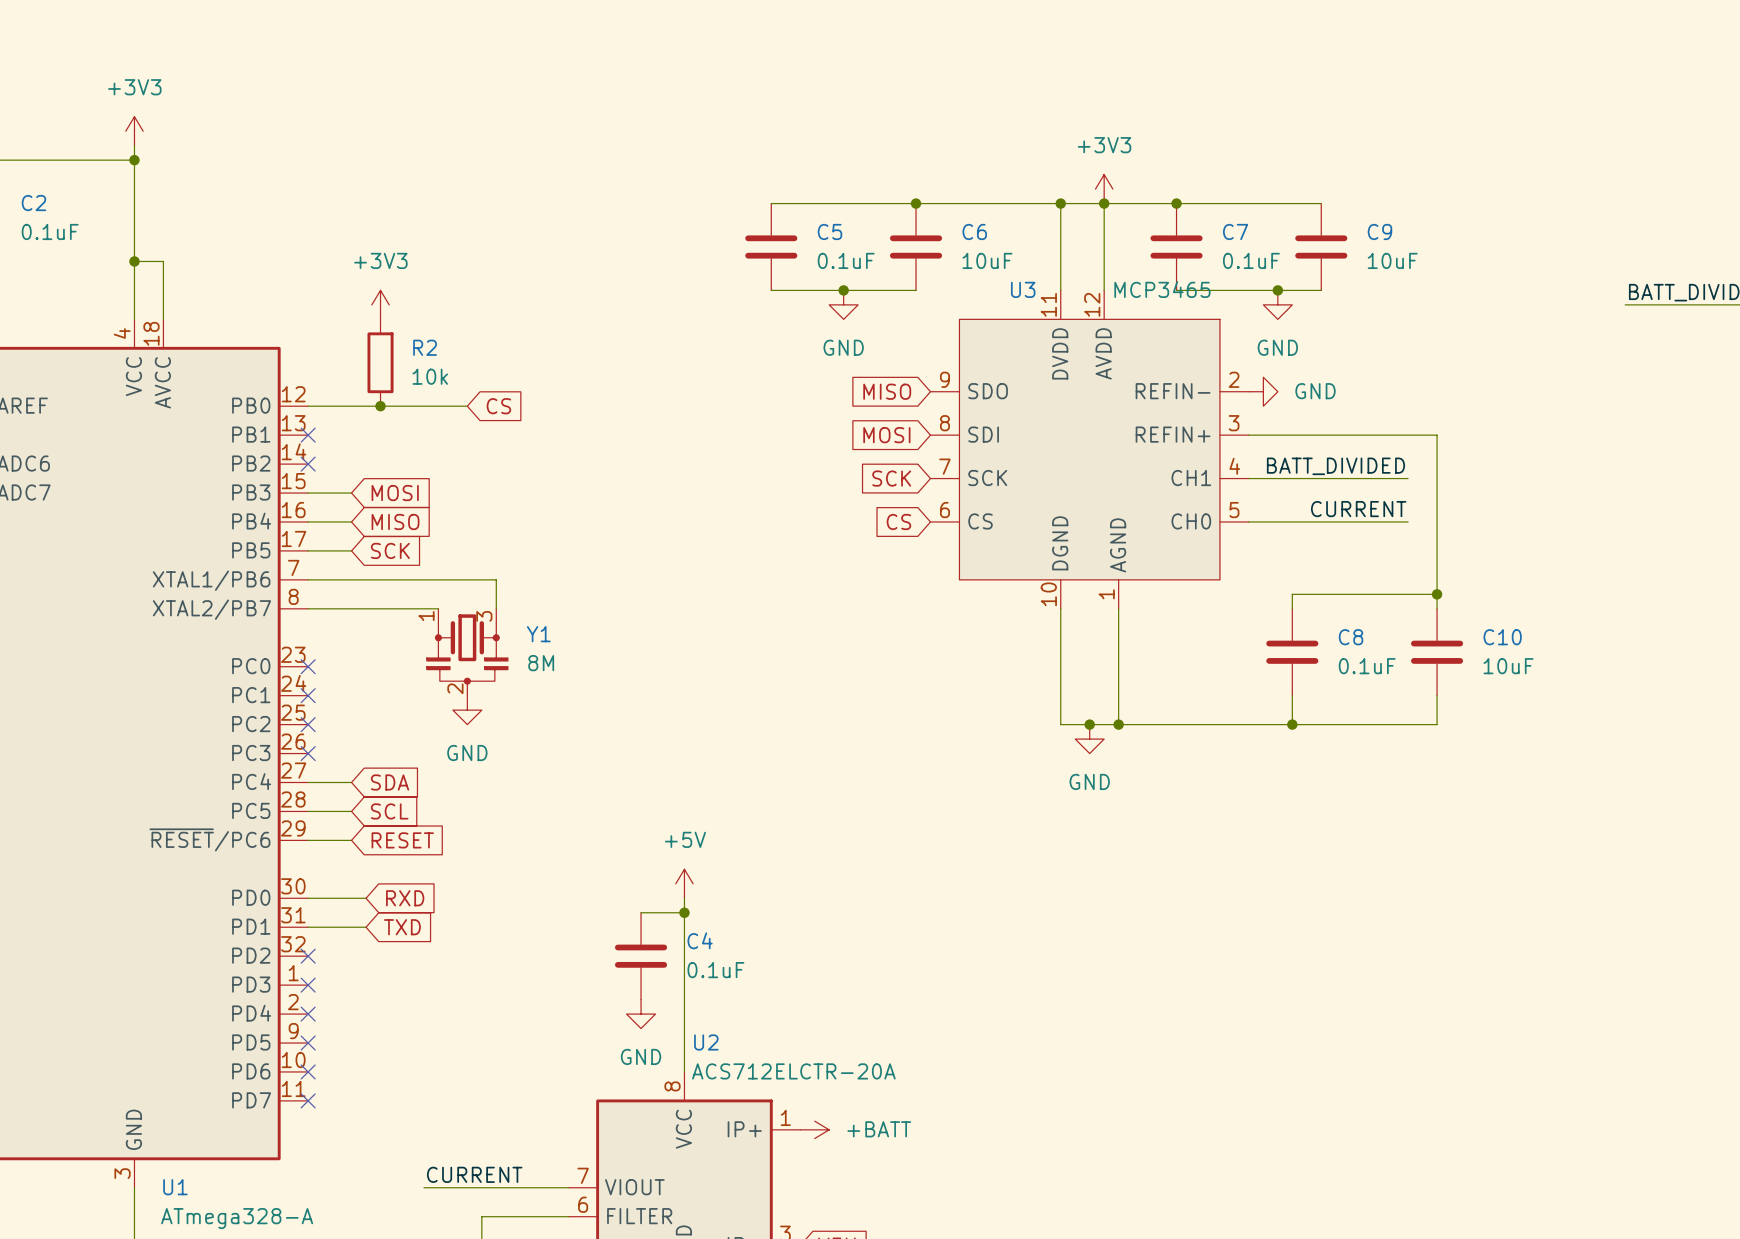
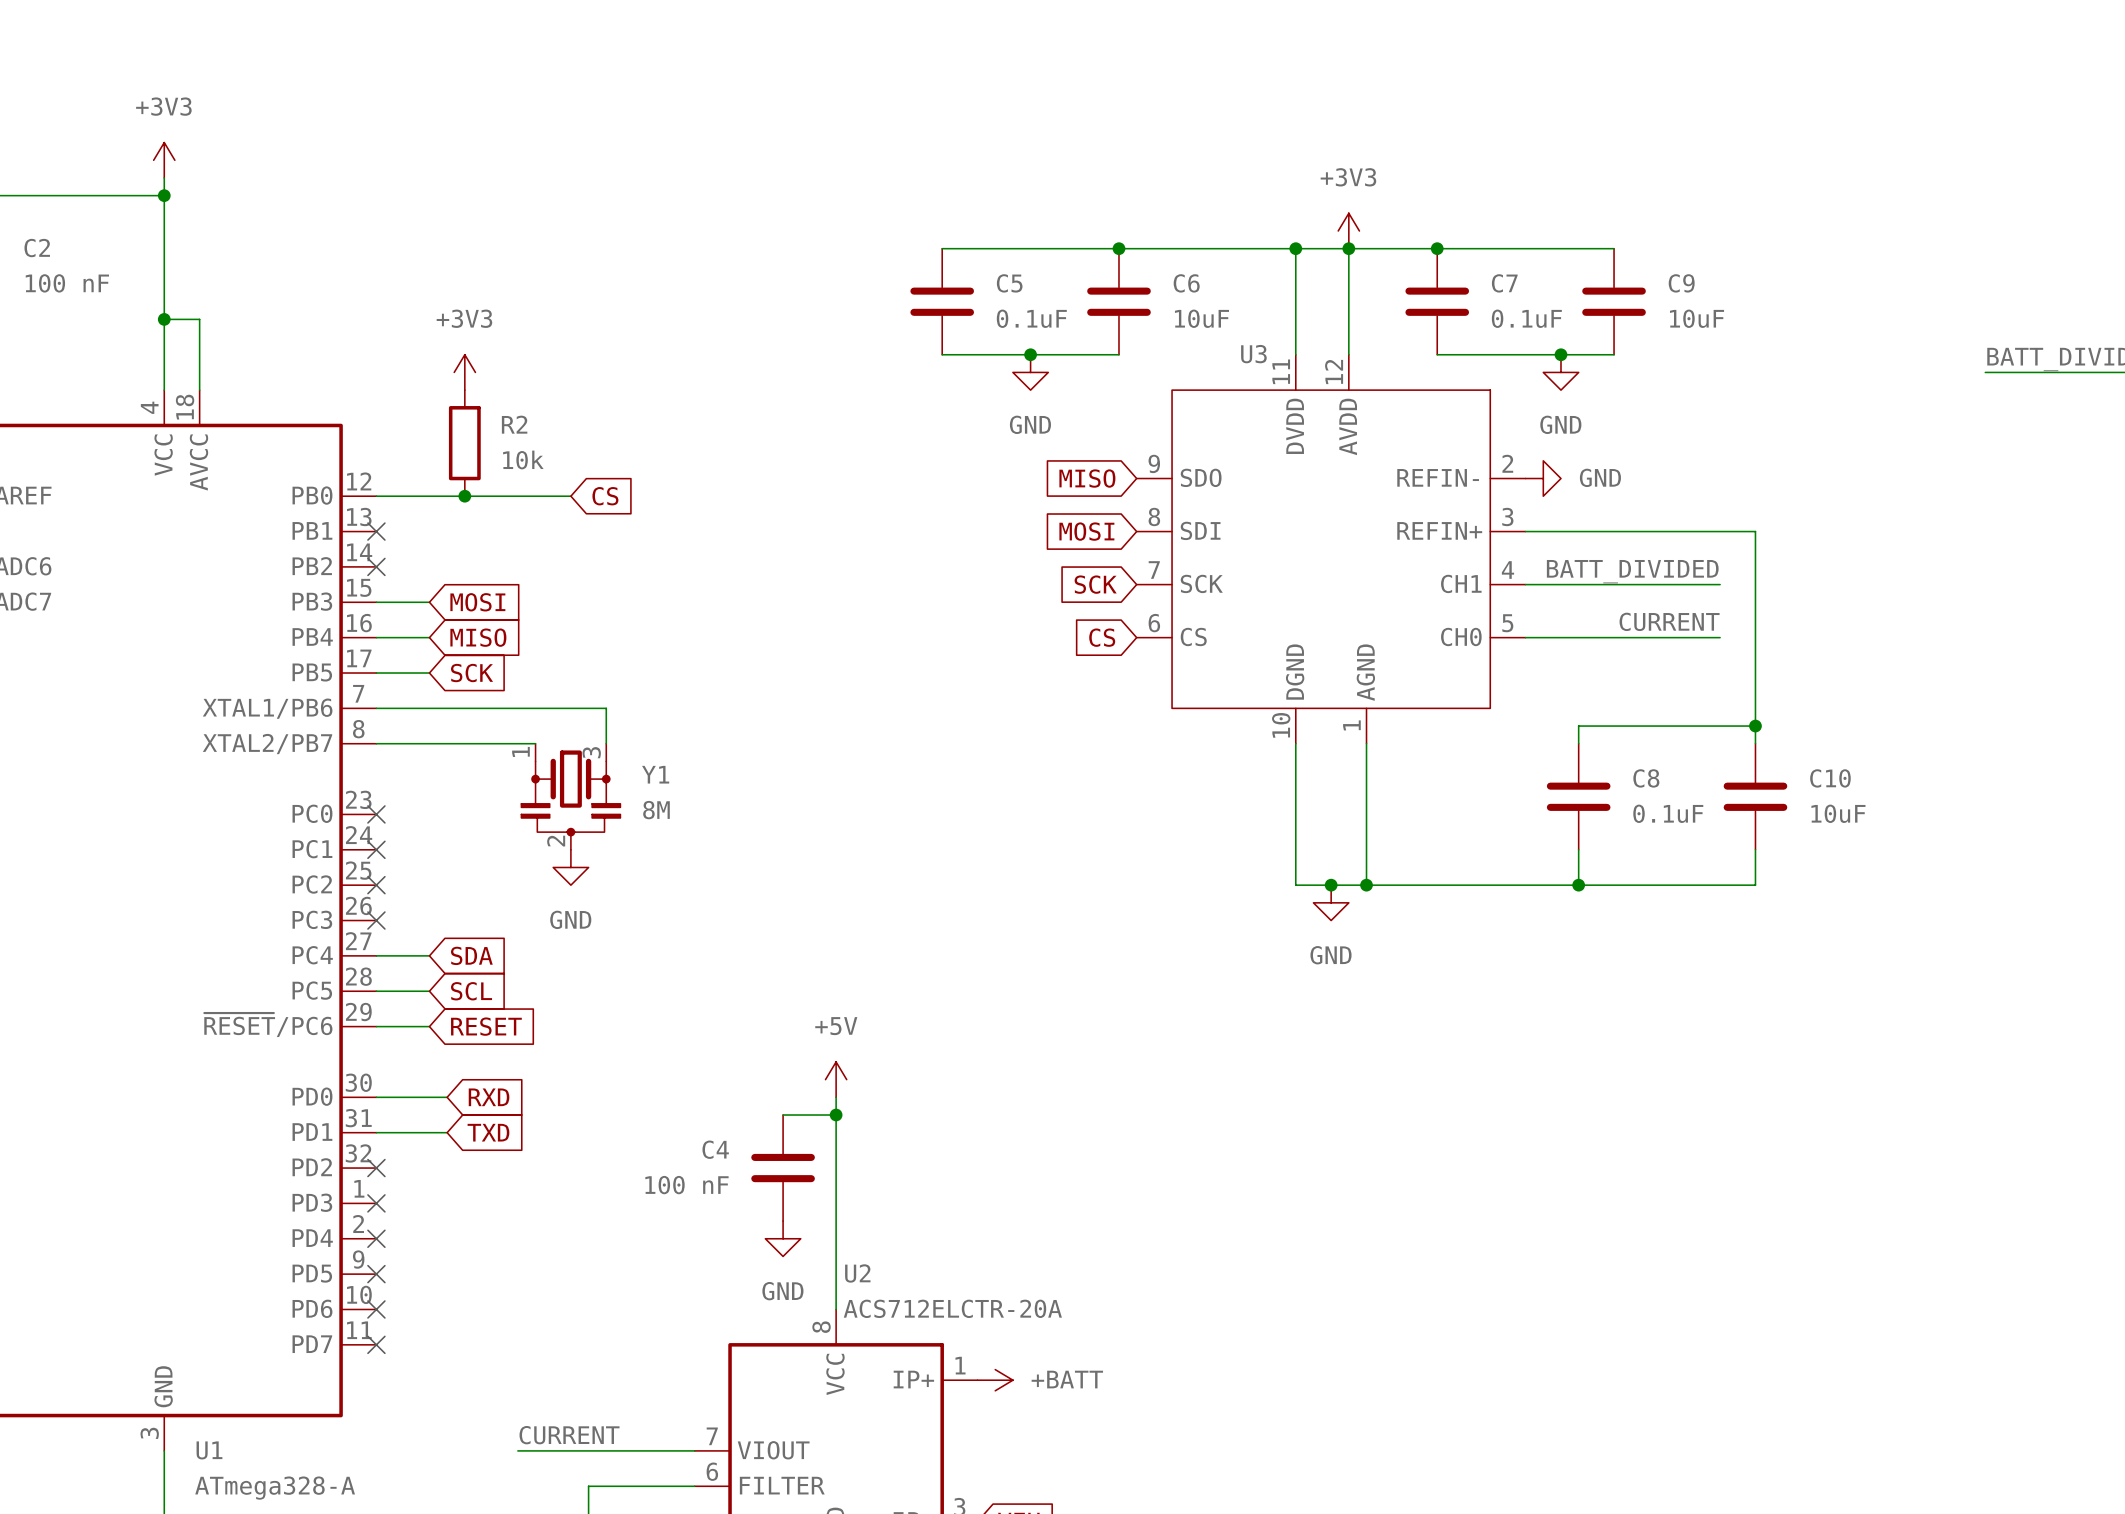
C2 value: 0.1uF (50, 231) -> 100 nF (67, 283)
U3 value: MCP3465 (1162, 289) -> none
C4 name position: C4 (700, 940) -> C4 (715, 1149)
C4 value: 0.1uF (715, 970) -> 100 nF (686, 1185)

